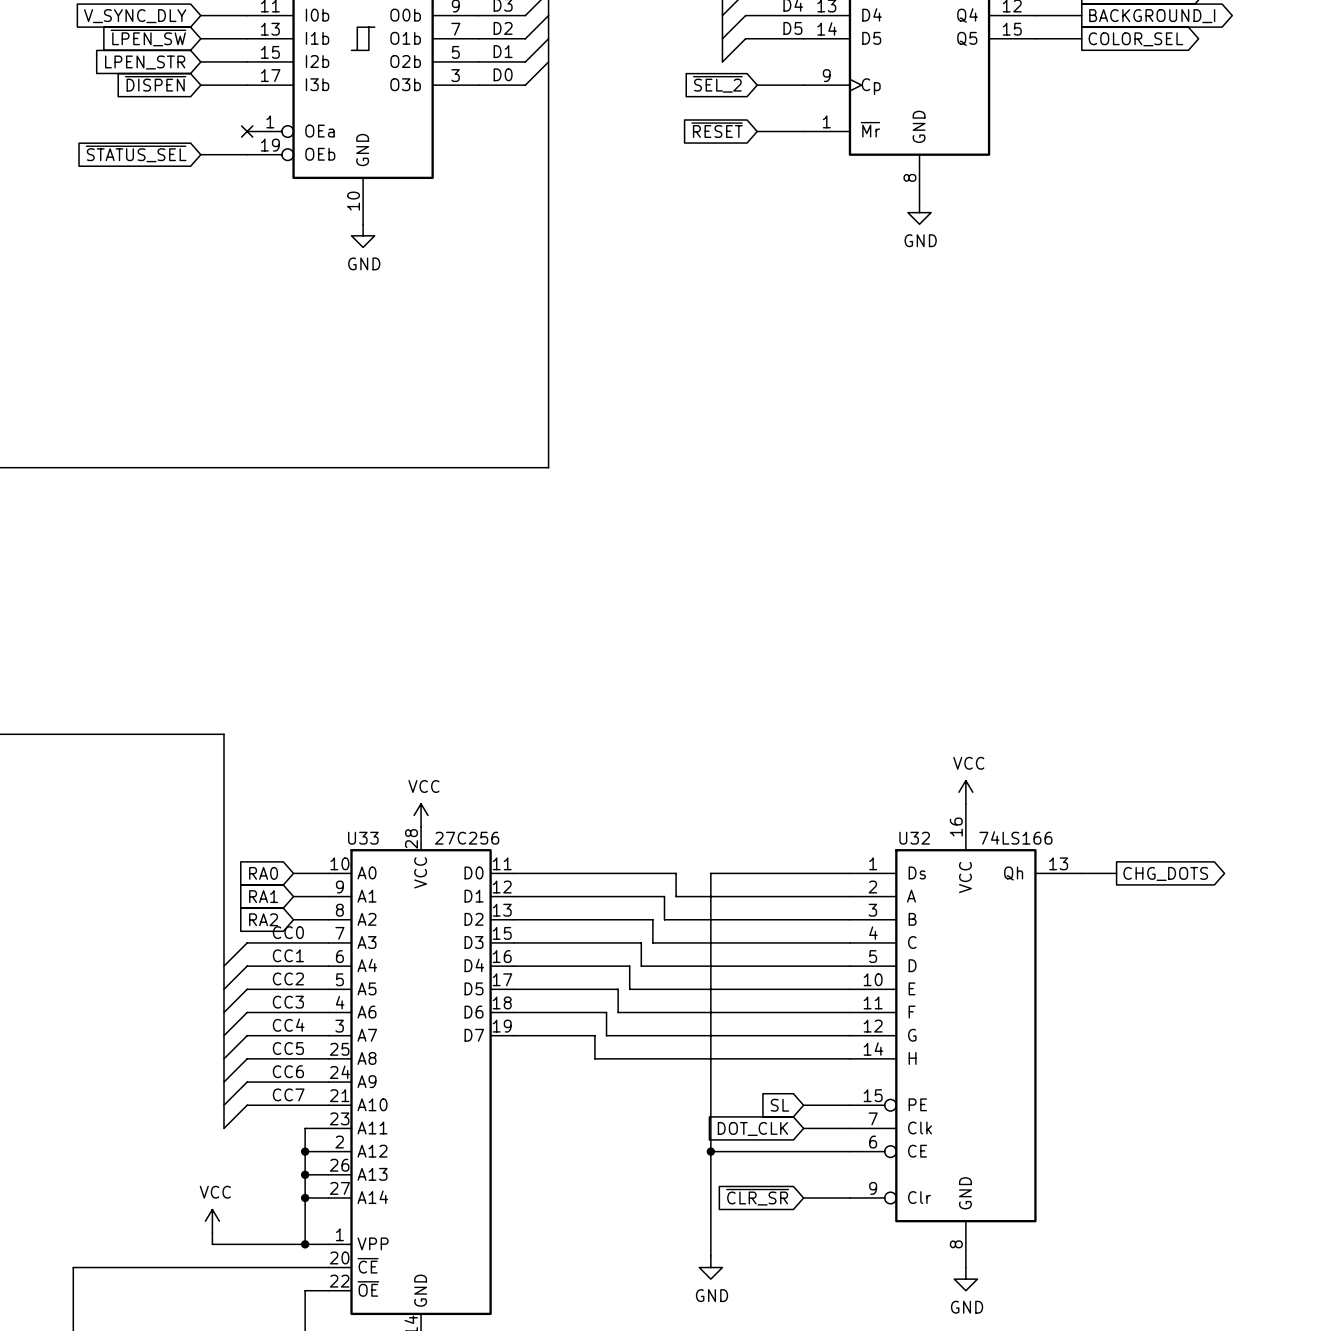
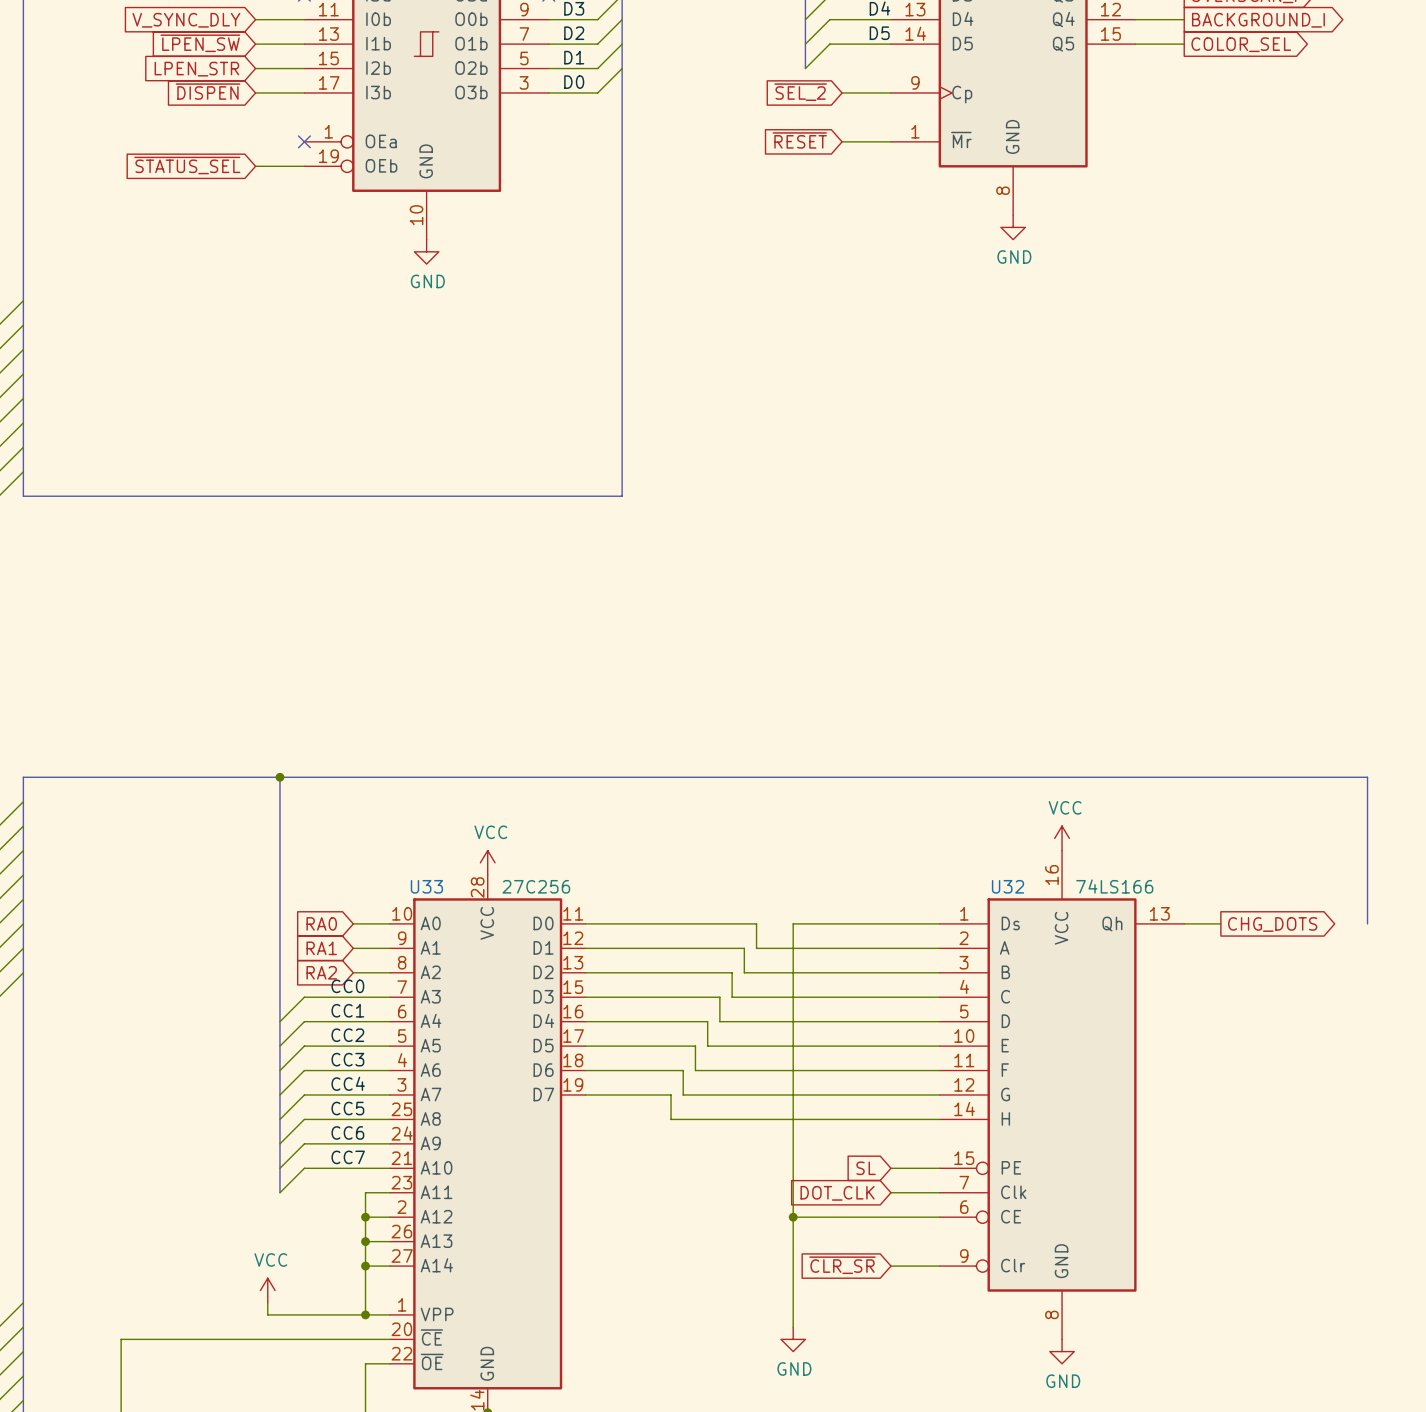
bus: none -> (279, 777) (1367, 777) (1367, 923)
junction: none -> (279, 777)

